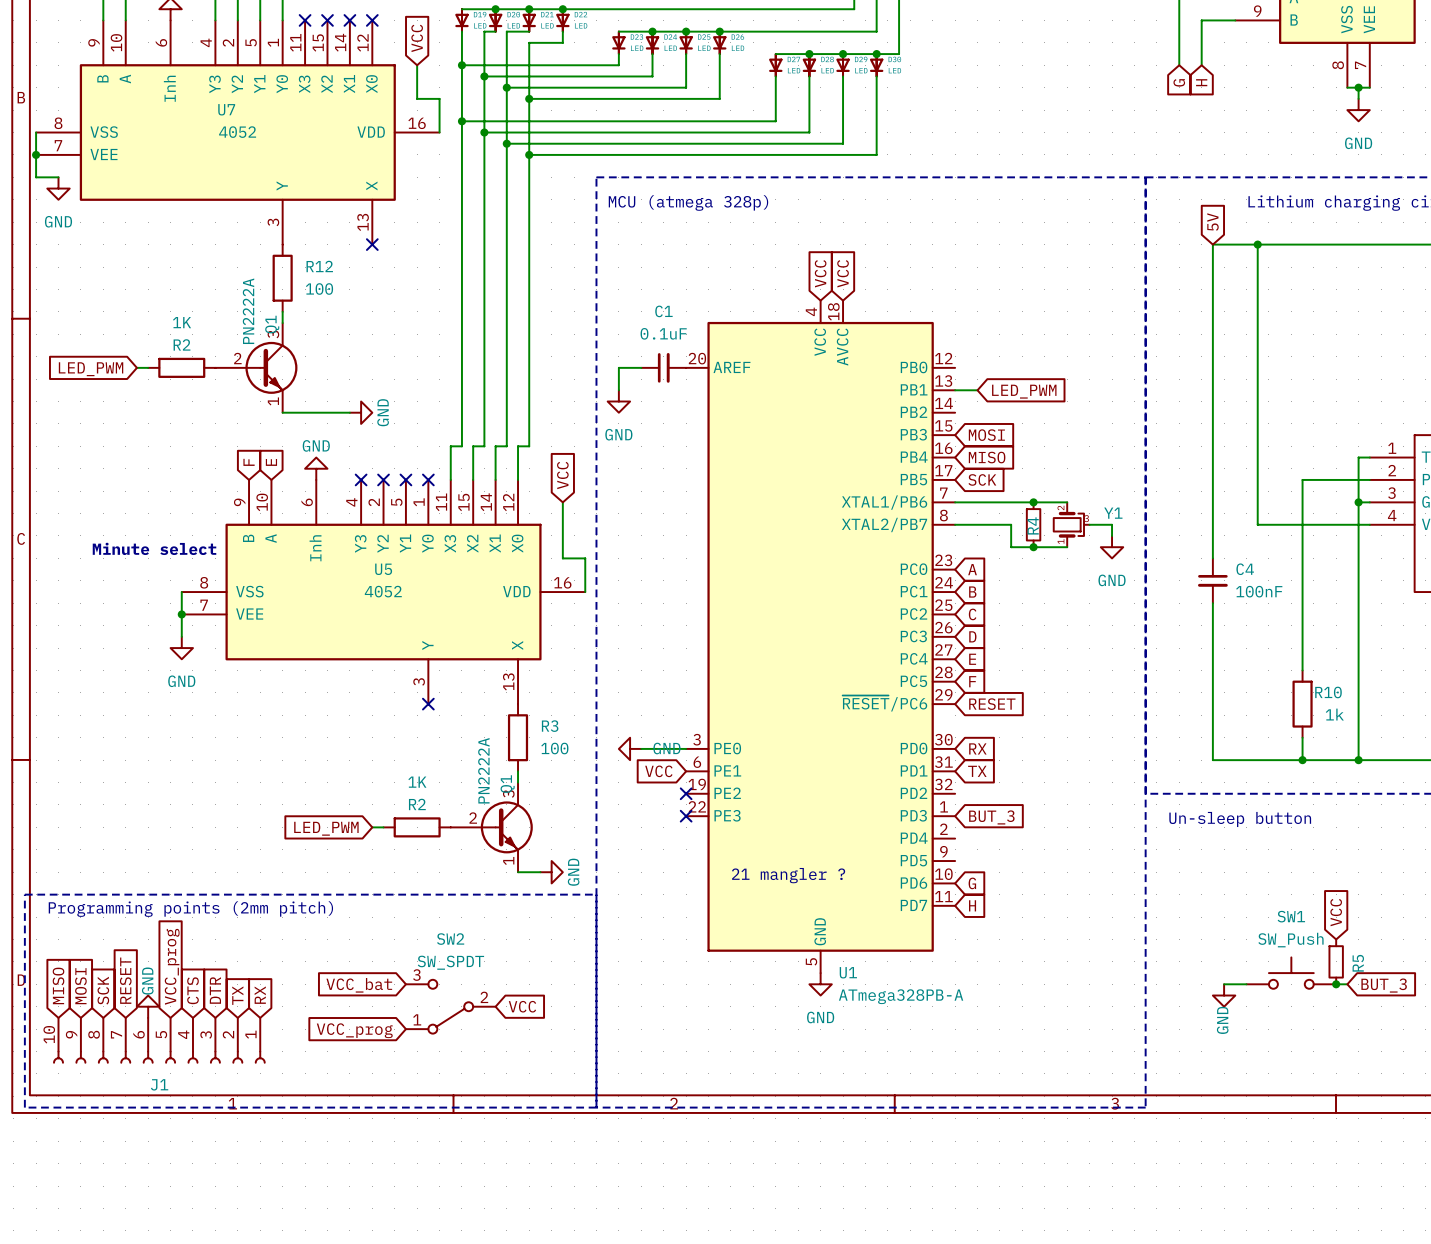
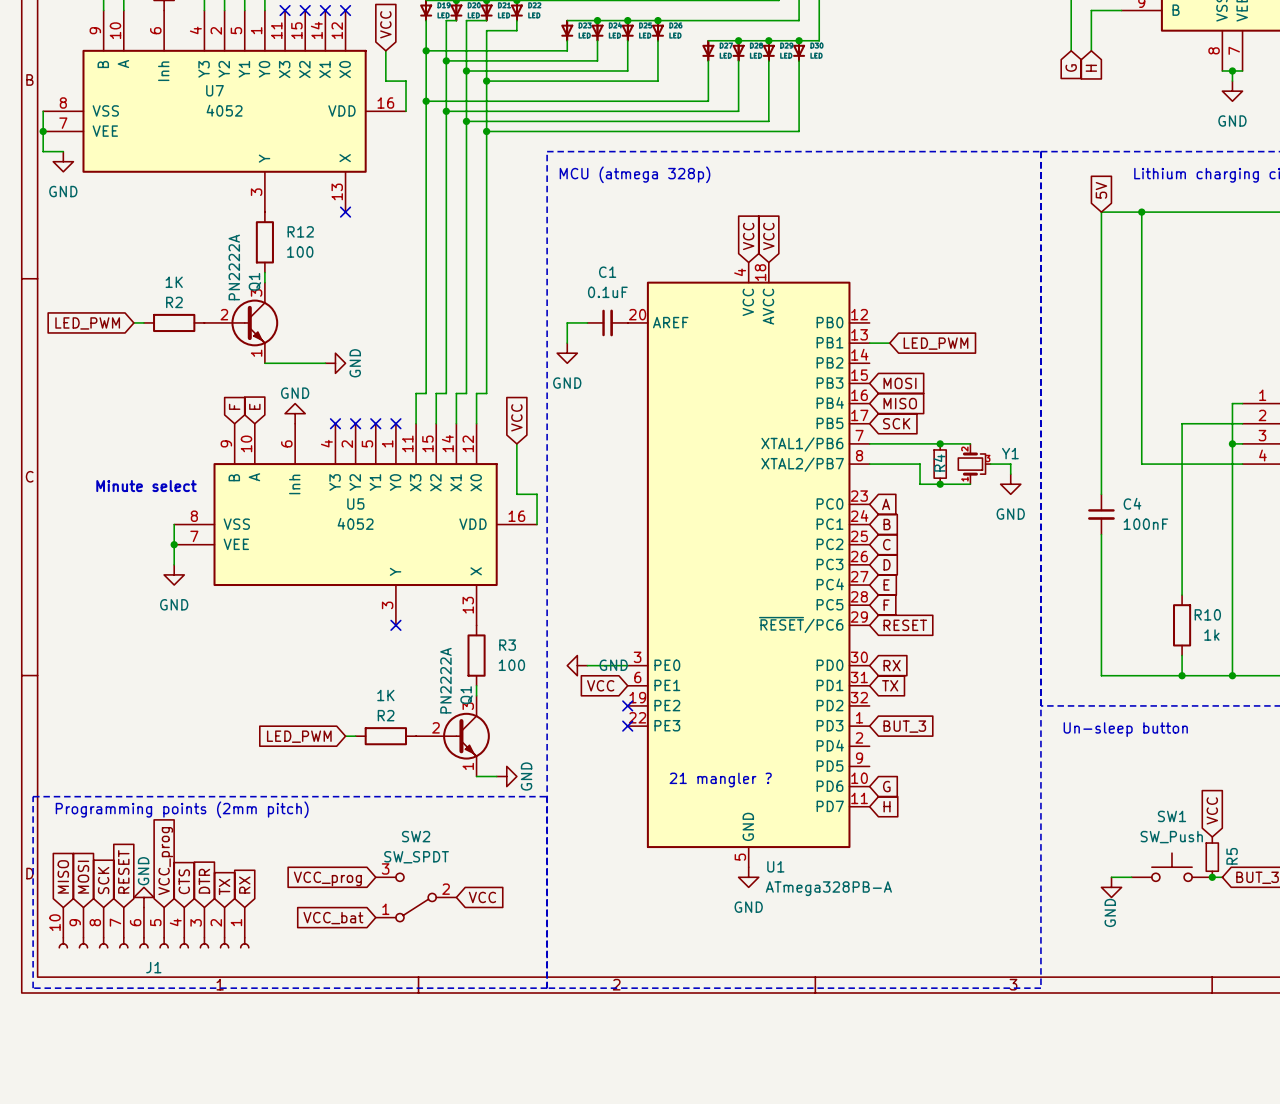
global label: VCC_bat (359, 985) -> VCC_prog (327, 878)
global label: VCC_prog (354, 1030) -> VCC_bat (333, 918)

